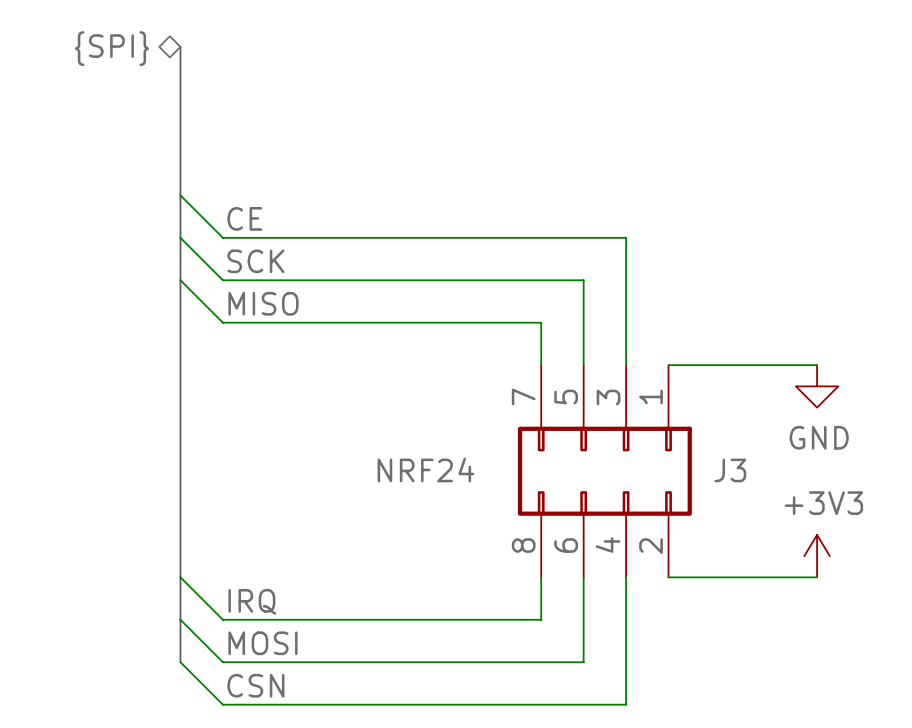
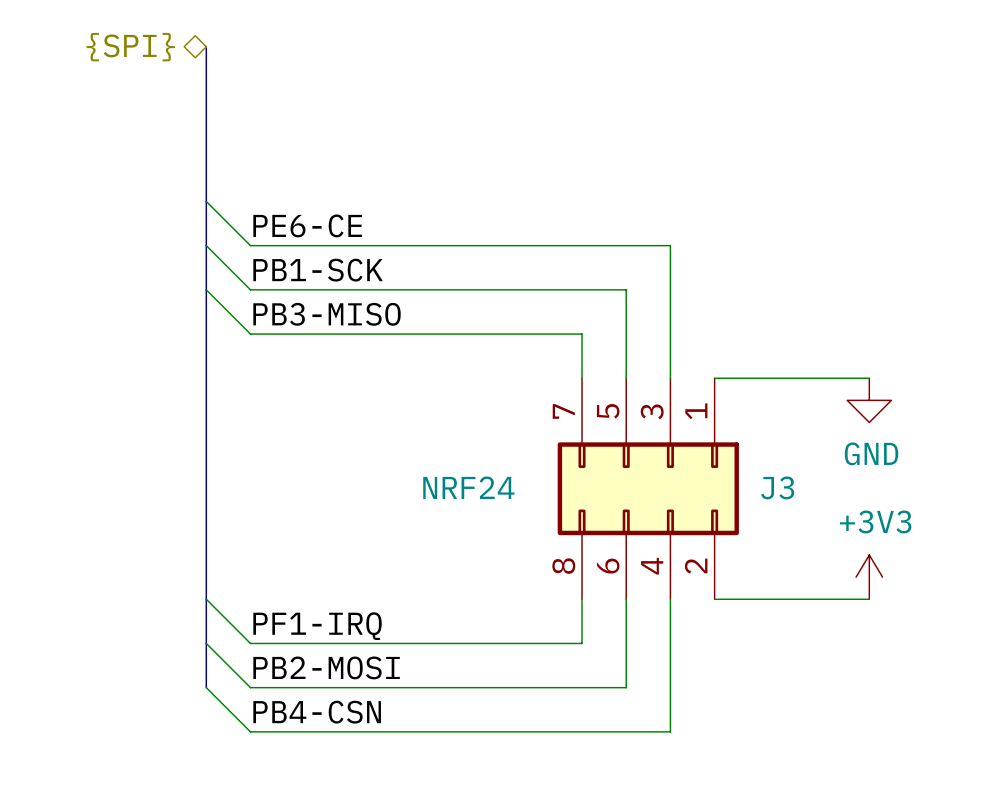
label: CE (244, 218) -> PE6-CE (307, 225)
label: SCK (255, 261) -> PB1-SCK (318, 270)
label: MISO (263, 303) -> PB3-MISO (327, 314)
label: IRQ (252, 601) -> PF1-IRQ (317, 626)
label: MOSI (262, 643) -> PB2-MOSI (326, 667)
label: CSN (255, 685) -> PB4-CSN (317, 712)

